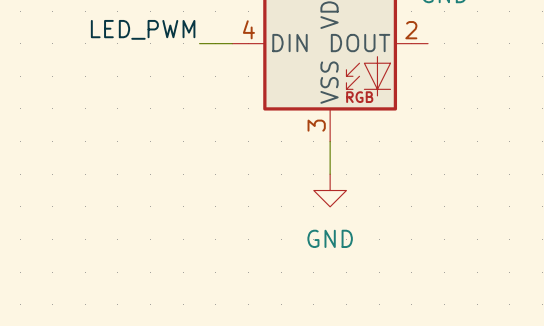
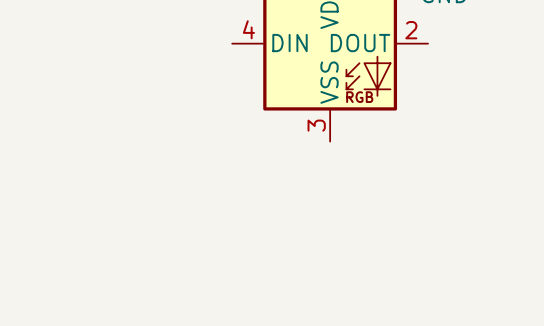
label: LED_PWM (143, 29) -> none
wire: (199, 43) (232, 43) -> none
wire: (330, 141) (330, 174) -> none
power symbol: GND (330, 190) -> none

